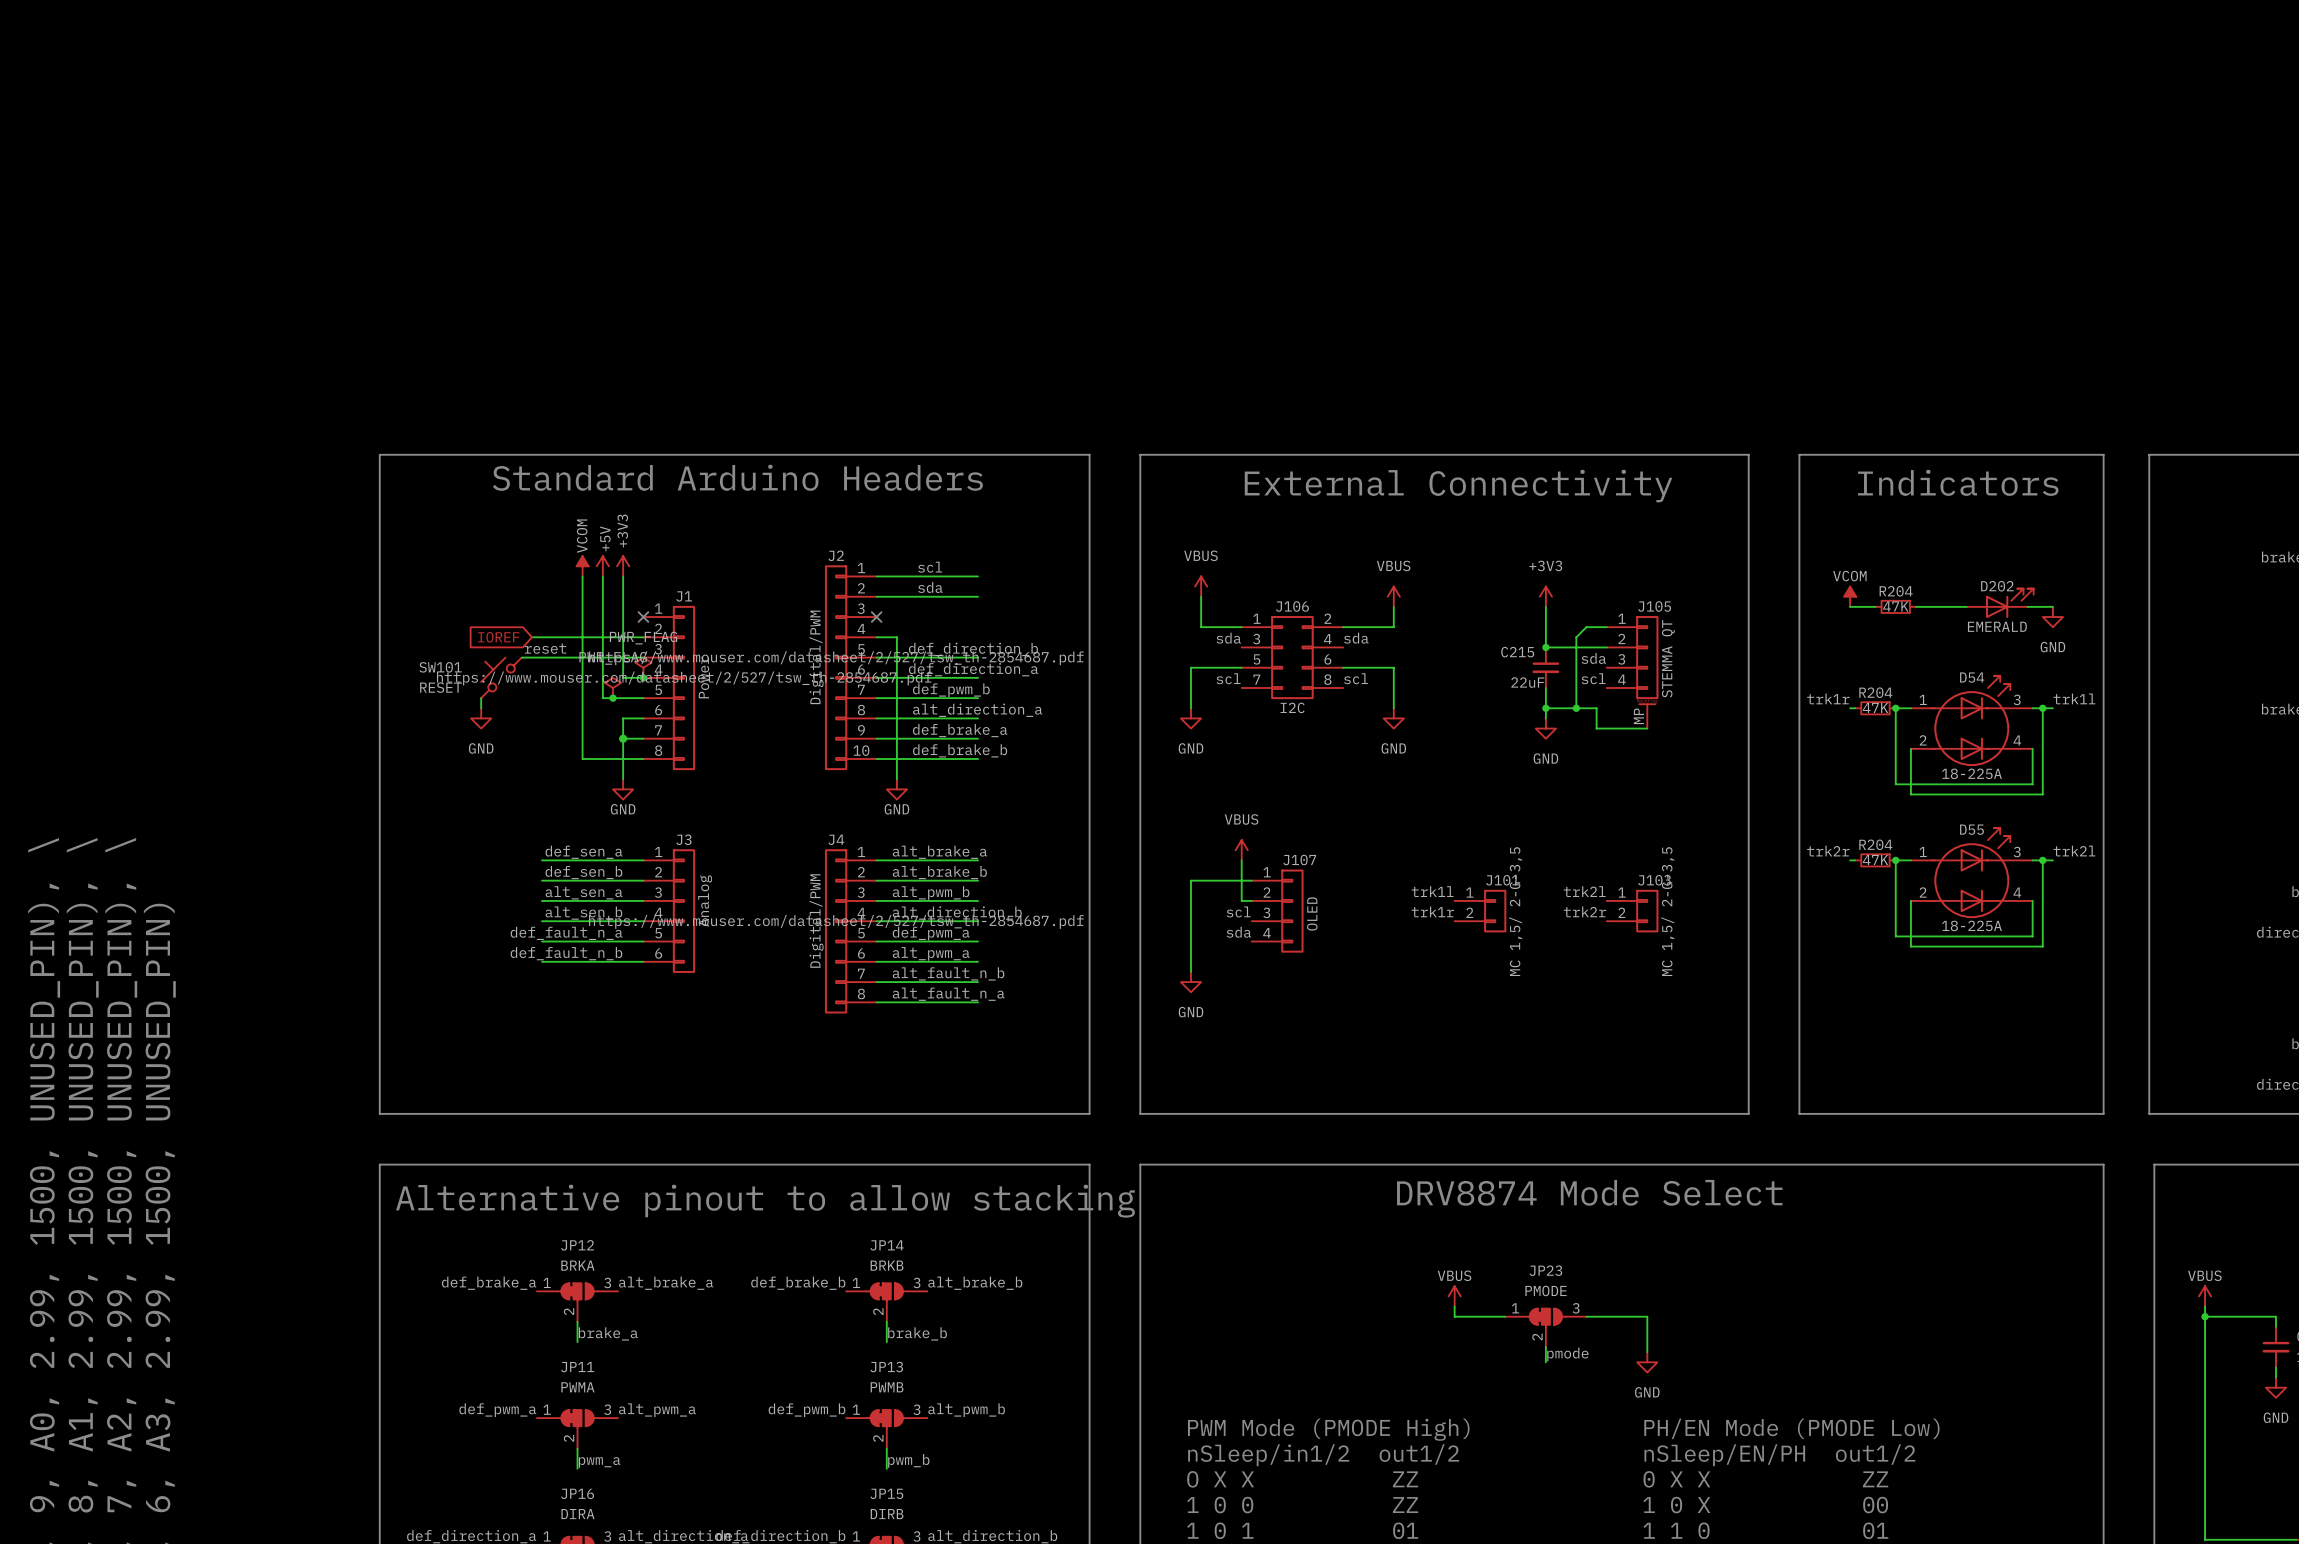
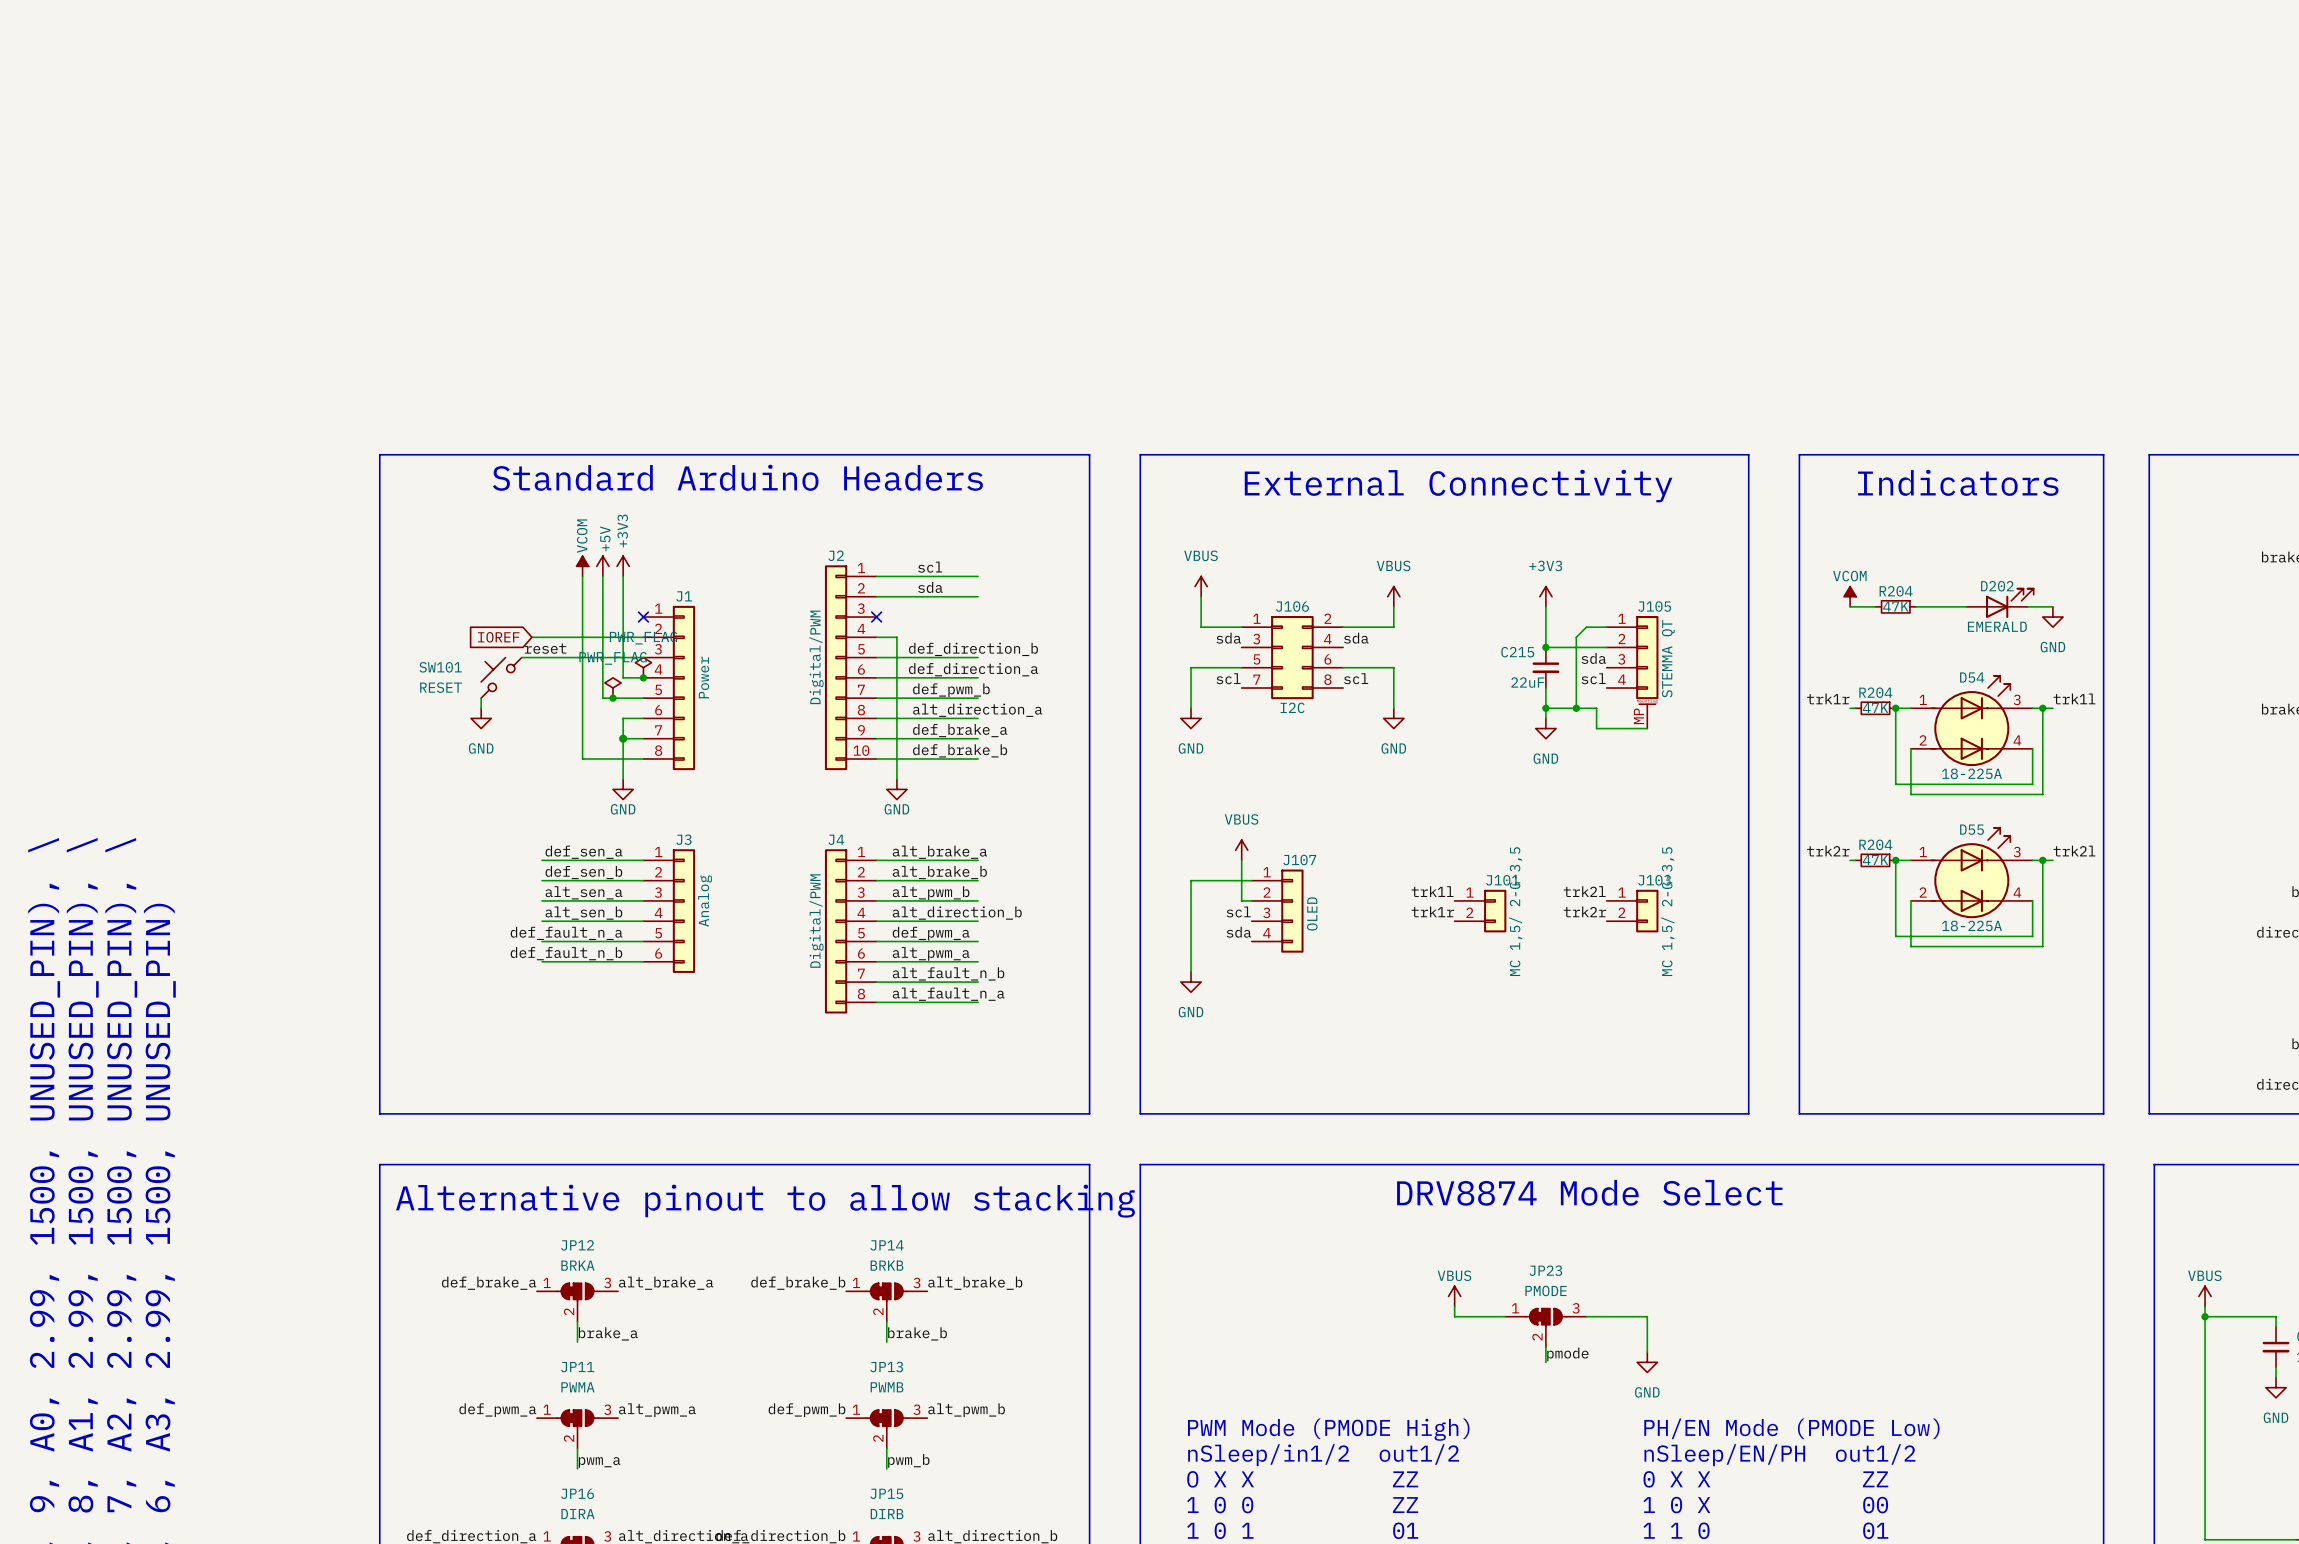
J2 text: https://www.mouser.com/datasheet/2/527/tsw_th-2854687.pdf (836, 658) -> none
J1 text: https://www.mouser.com/datasheet/2/527/tsw_th-2854687.pdf (684, 678) -> none
J4 text: https://www.mouser.com/datasheet/2/527/tsw_th-2854687.pdf (836, 921) -> none

